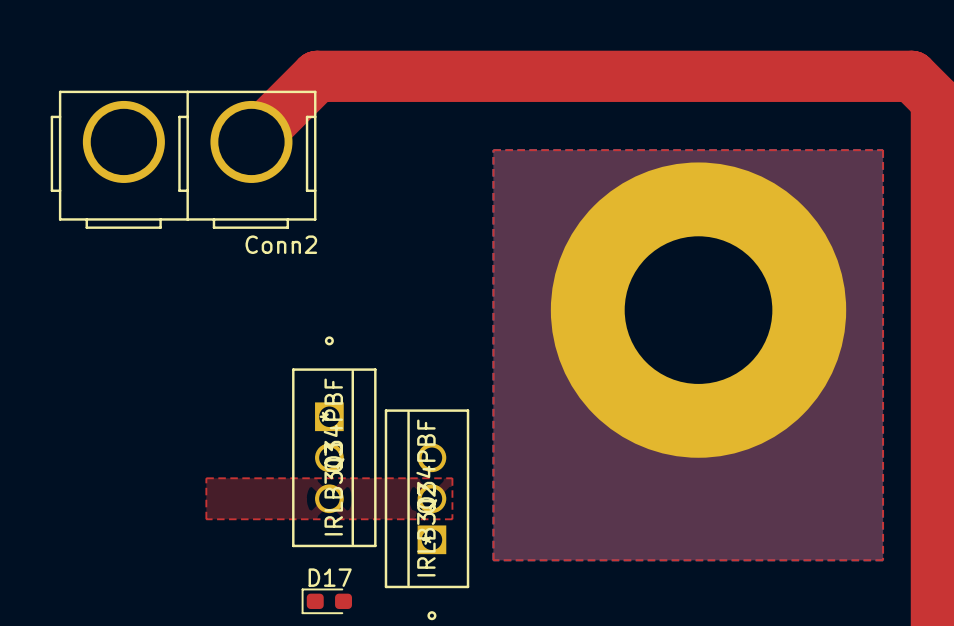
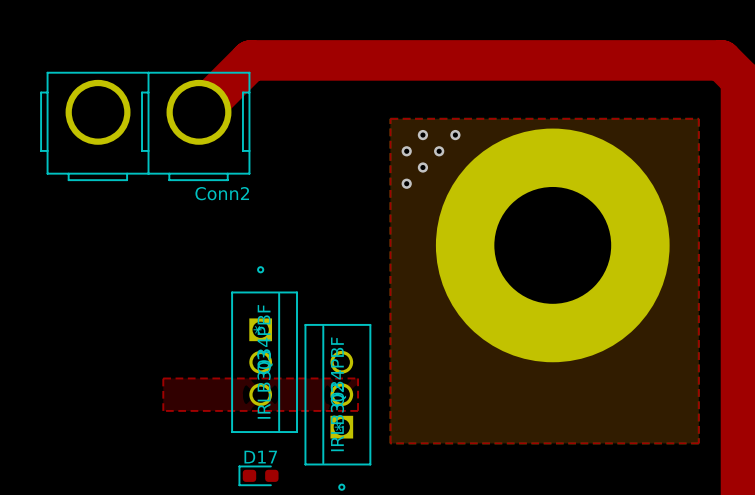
via: none -> (422, 135)
via: none -> (455, 135)
via: none -> (406, 151)
via: none -> (439, 151)
via: none -> (422, 167)
via: none -> (406, 183)

